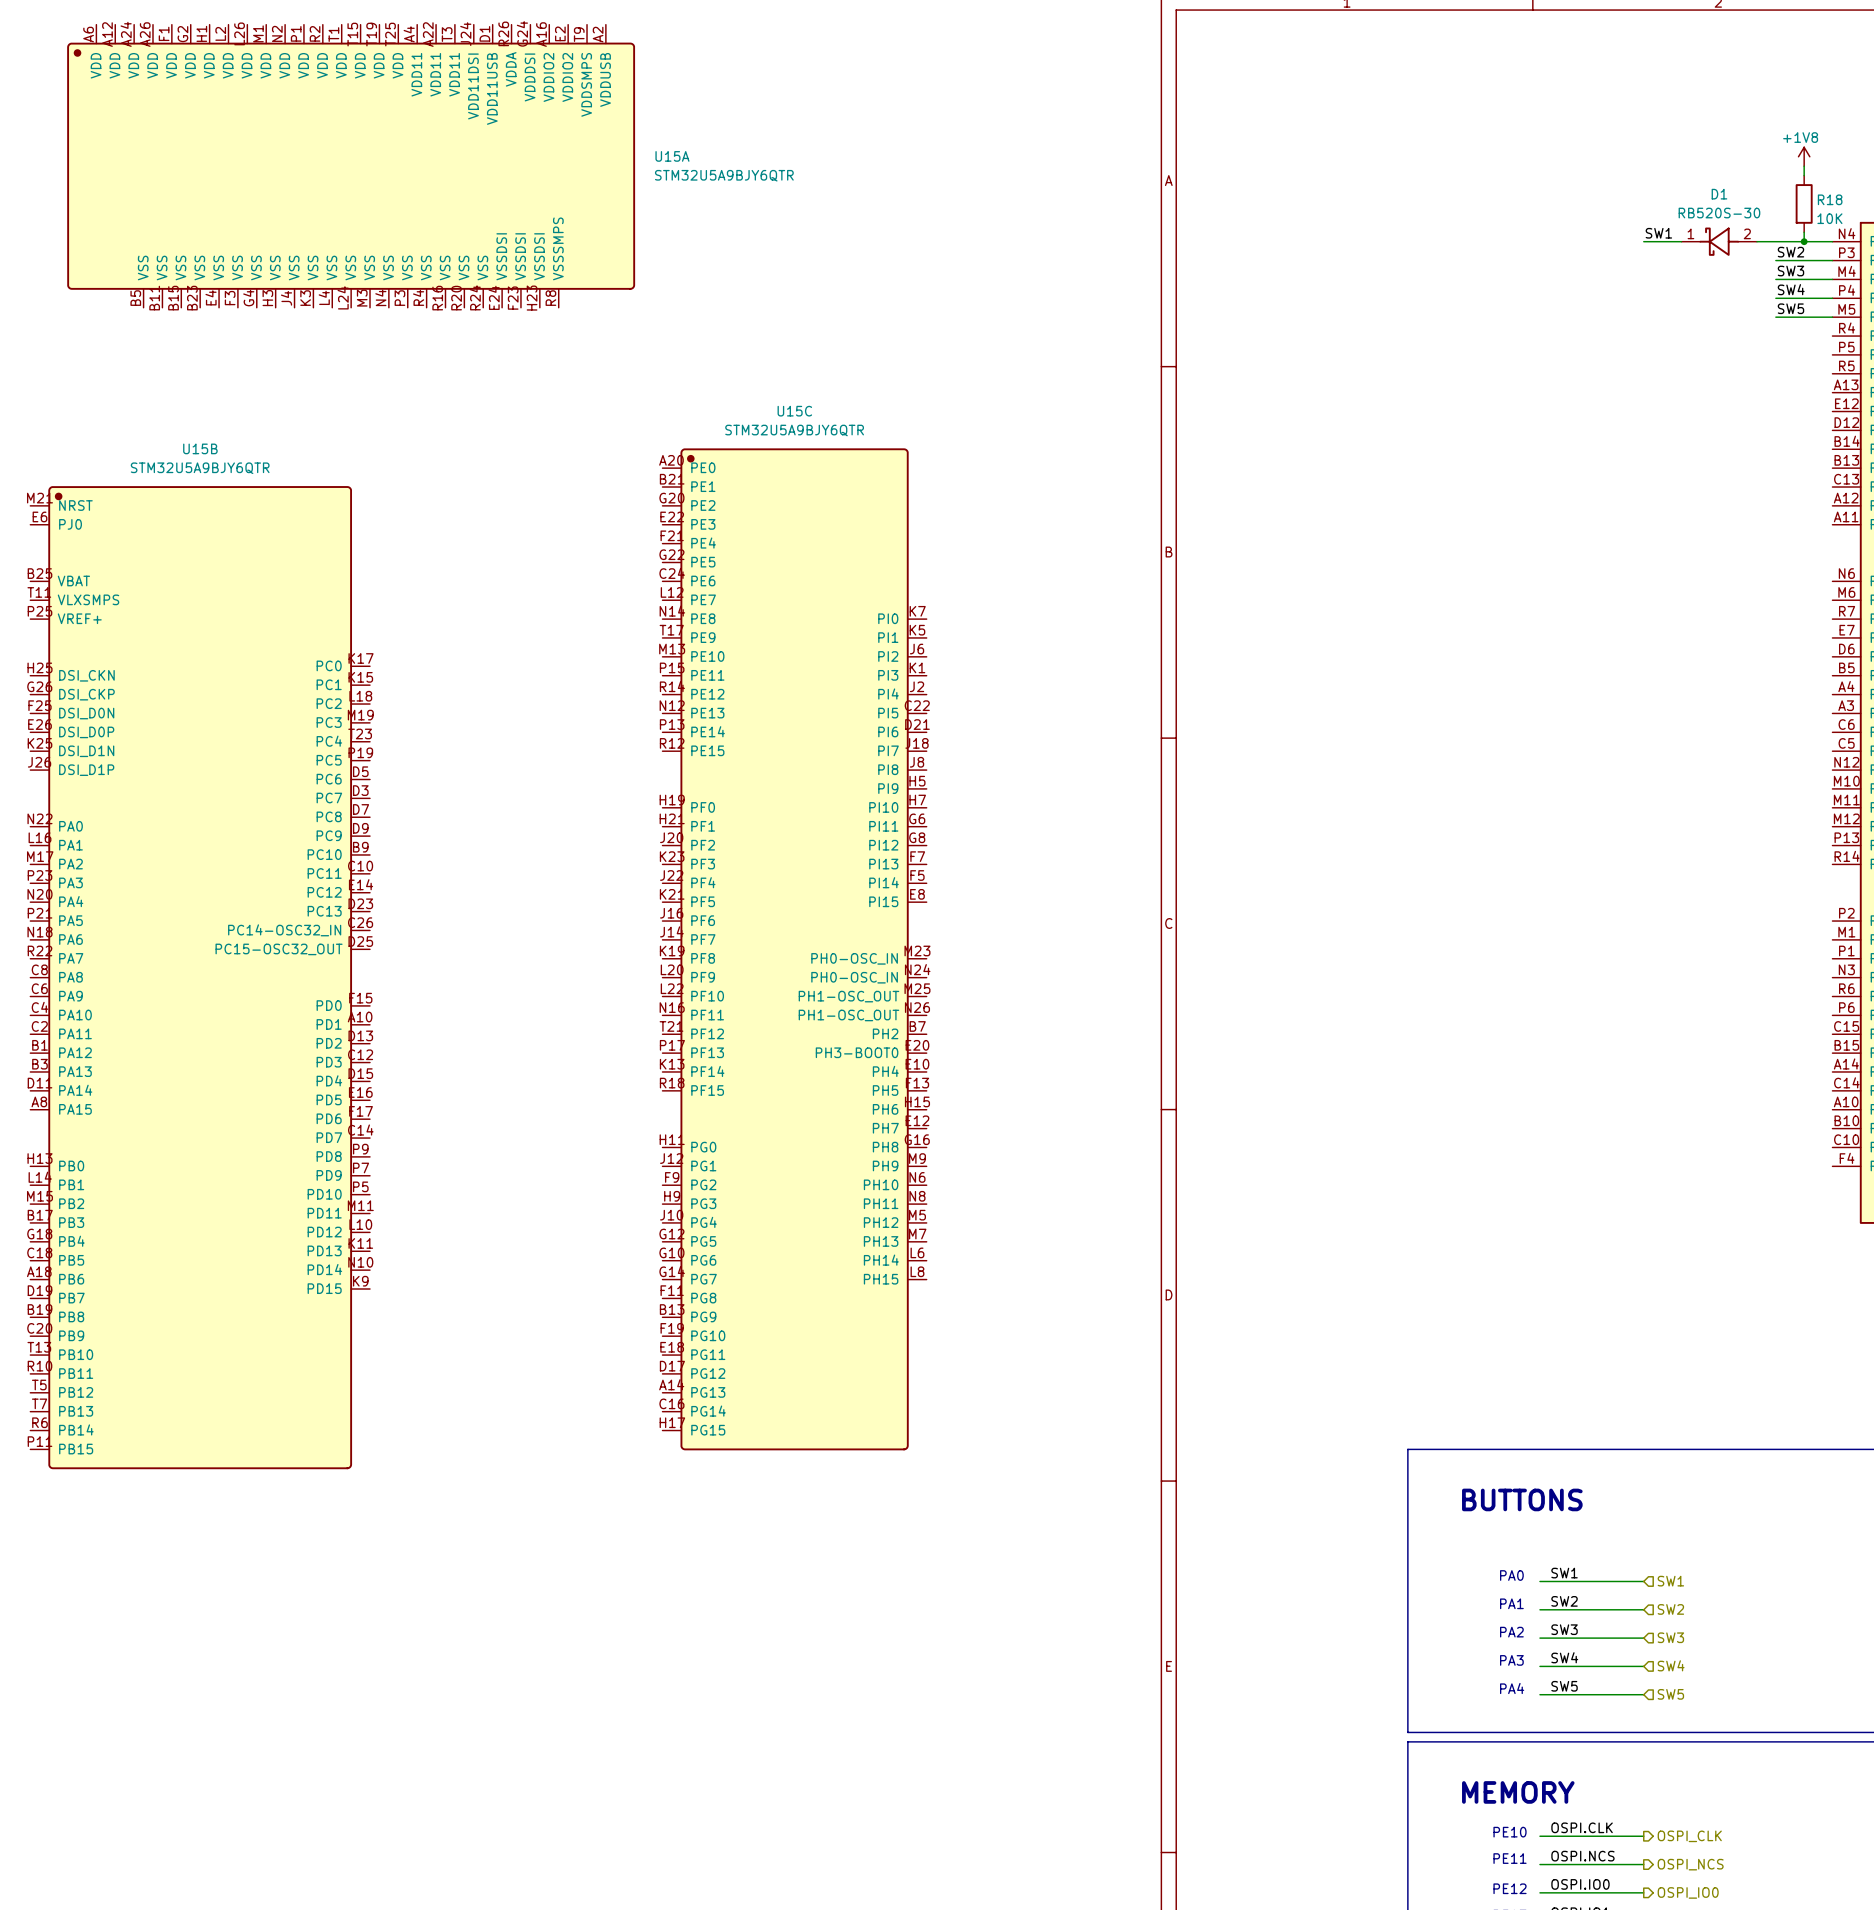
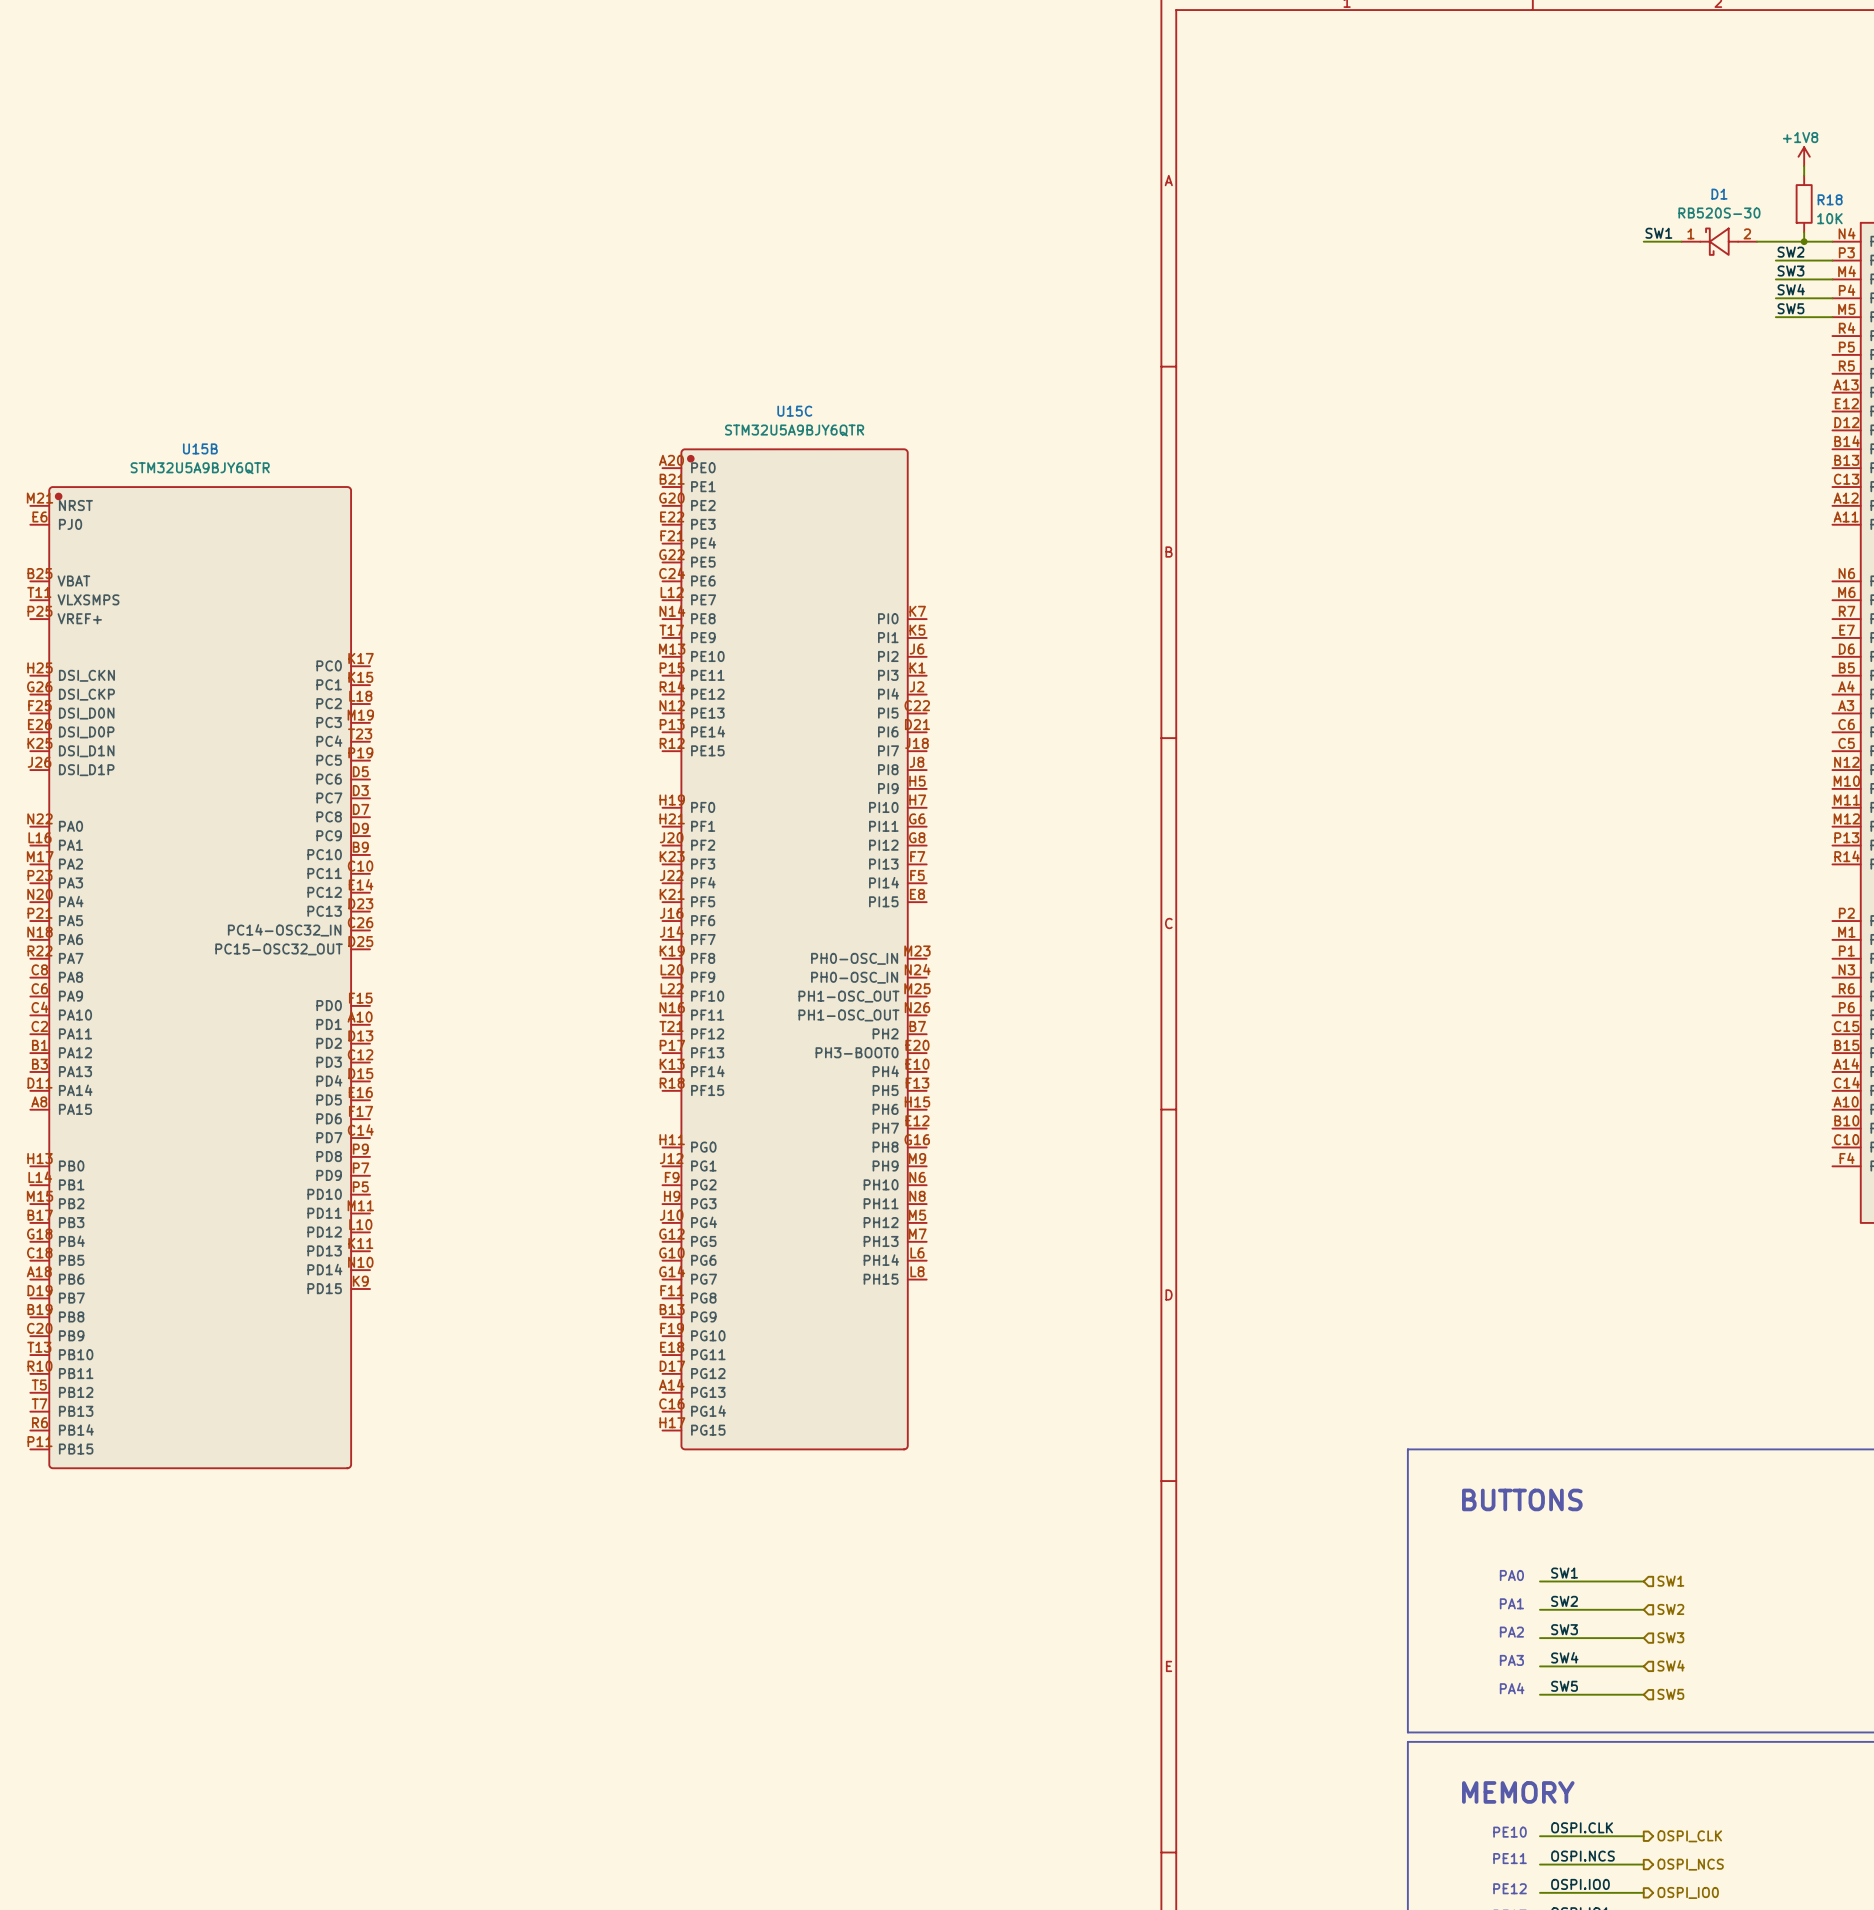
U15A: STM32U5A9BJY6QTR (351, 166) -> none

